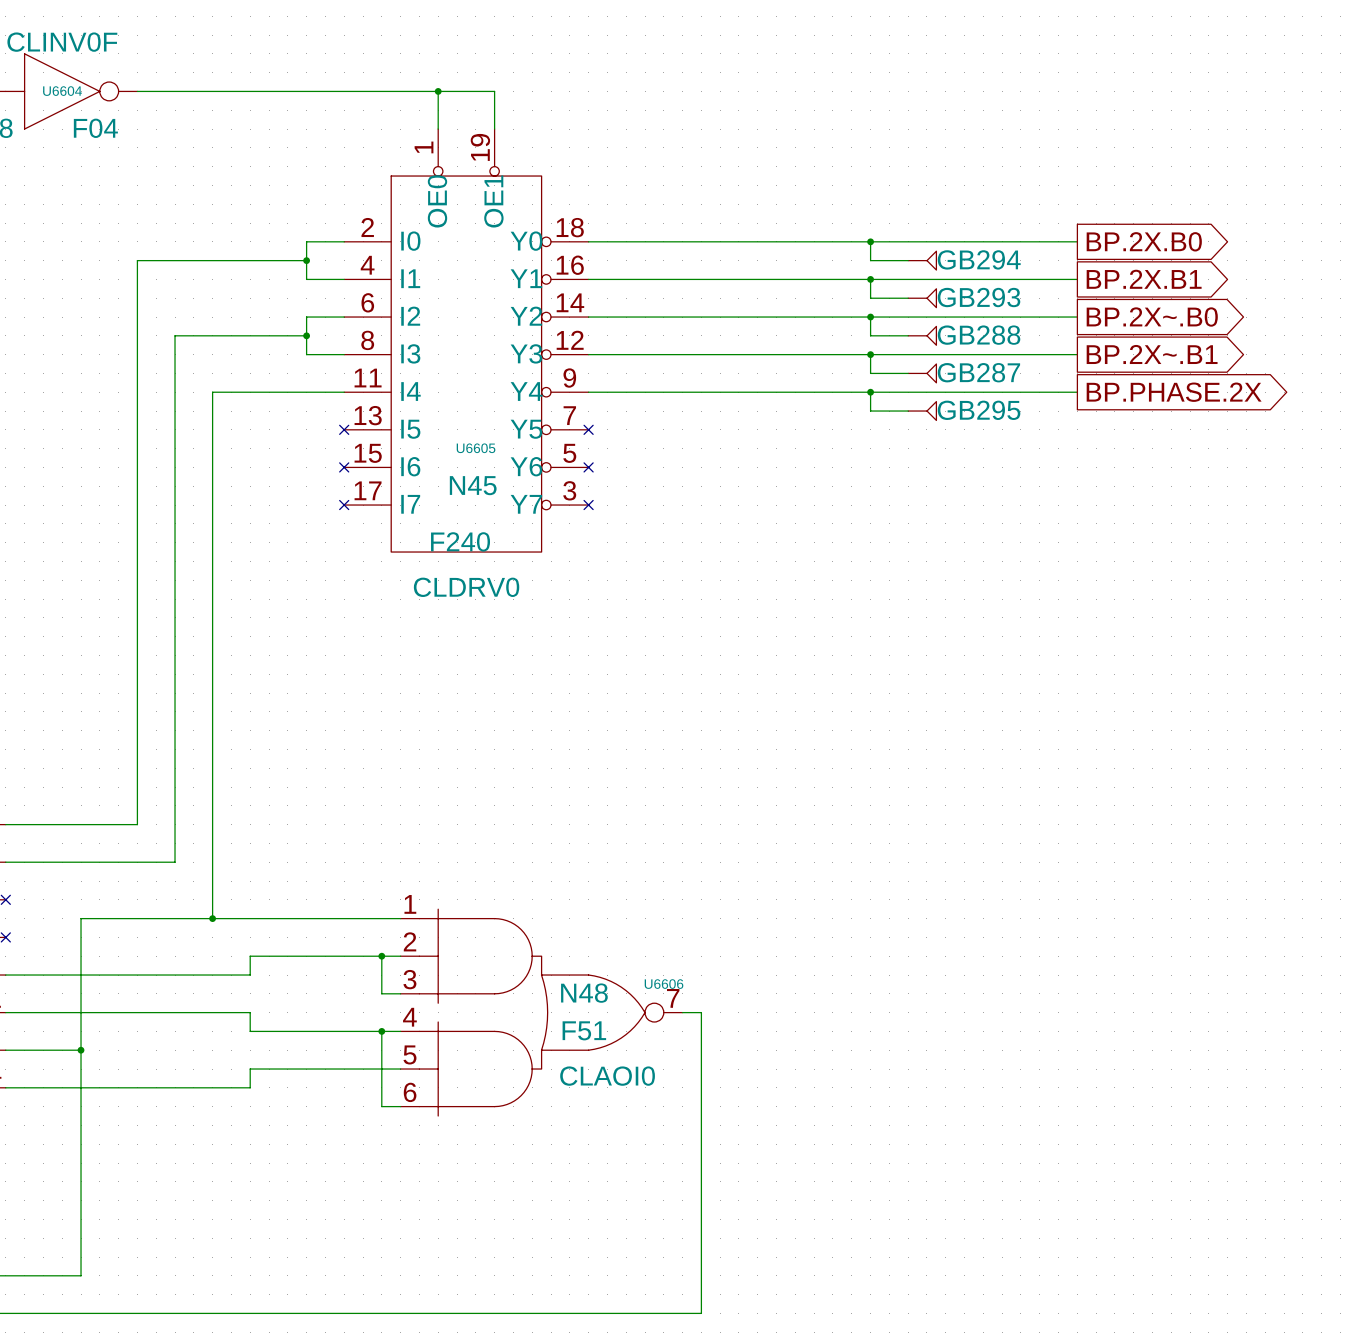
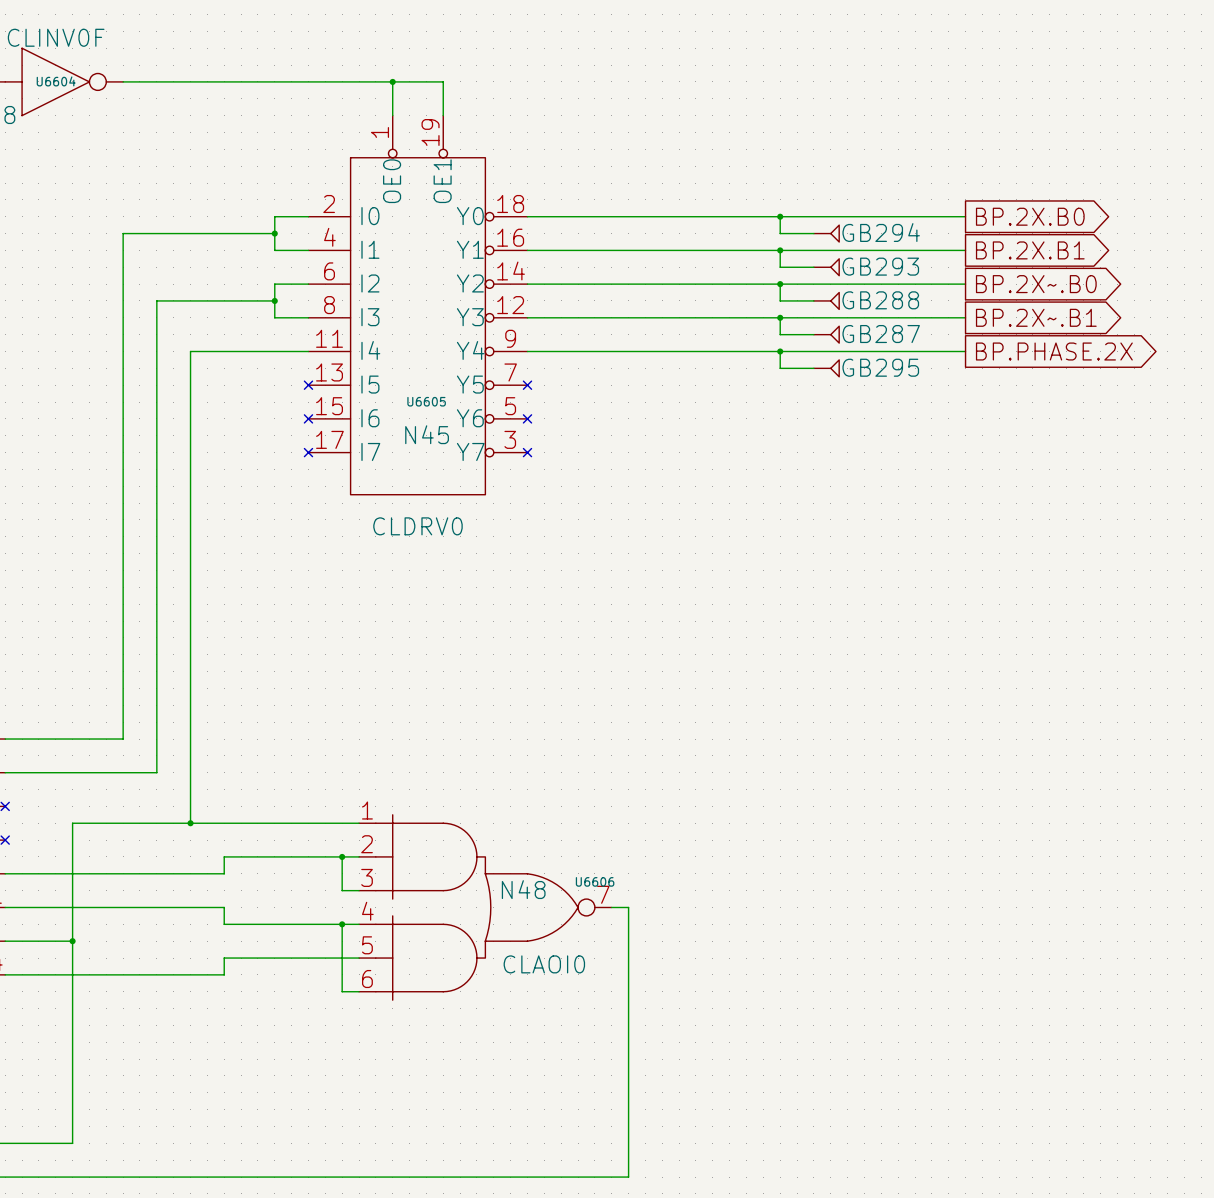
U6604 value: F04 (95, 128) -> none
U6605 value: F240 (460, 541) -> none
U6606 value: F51 (584, 1030) -> none

